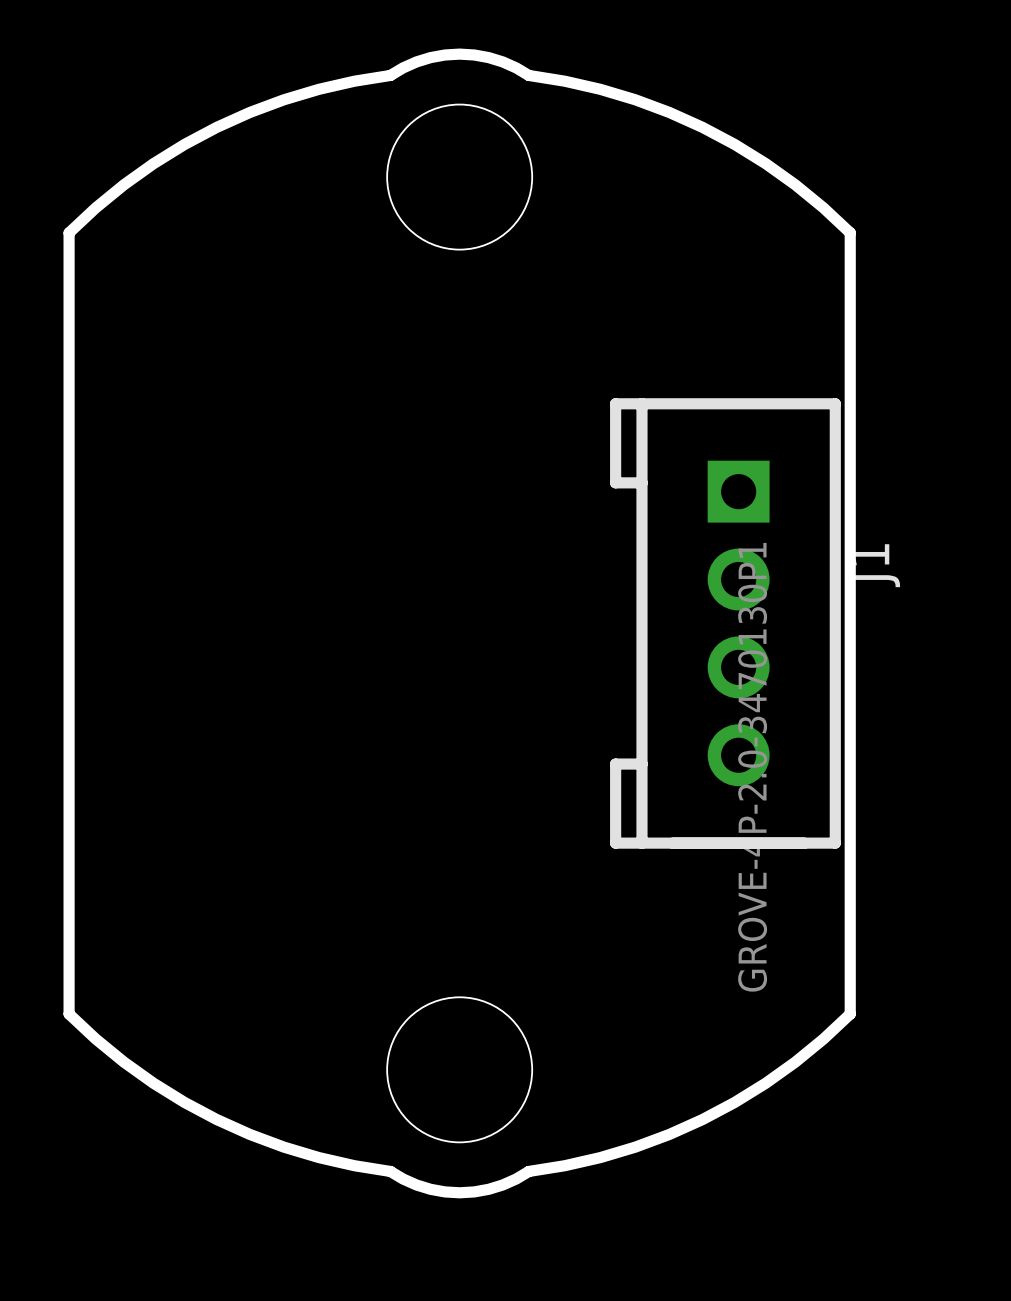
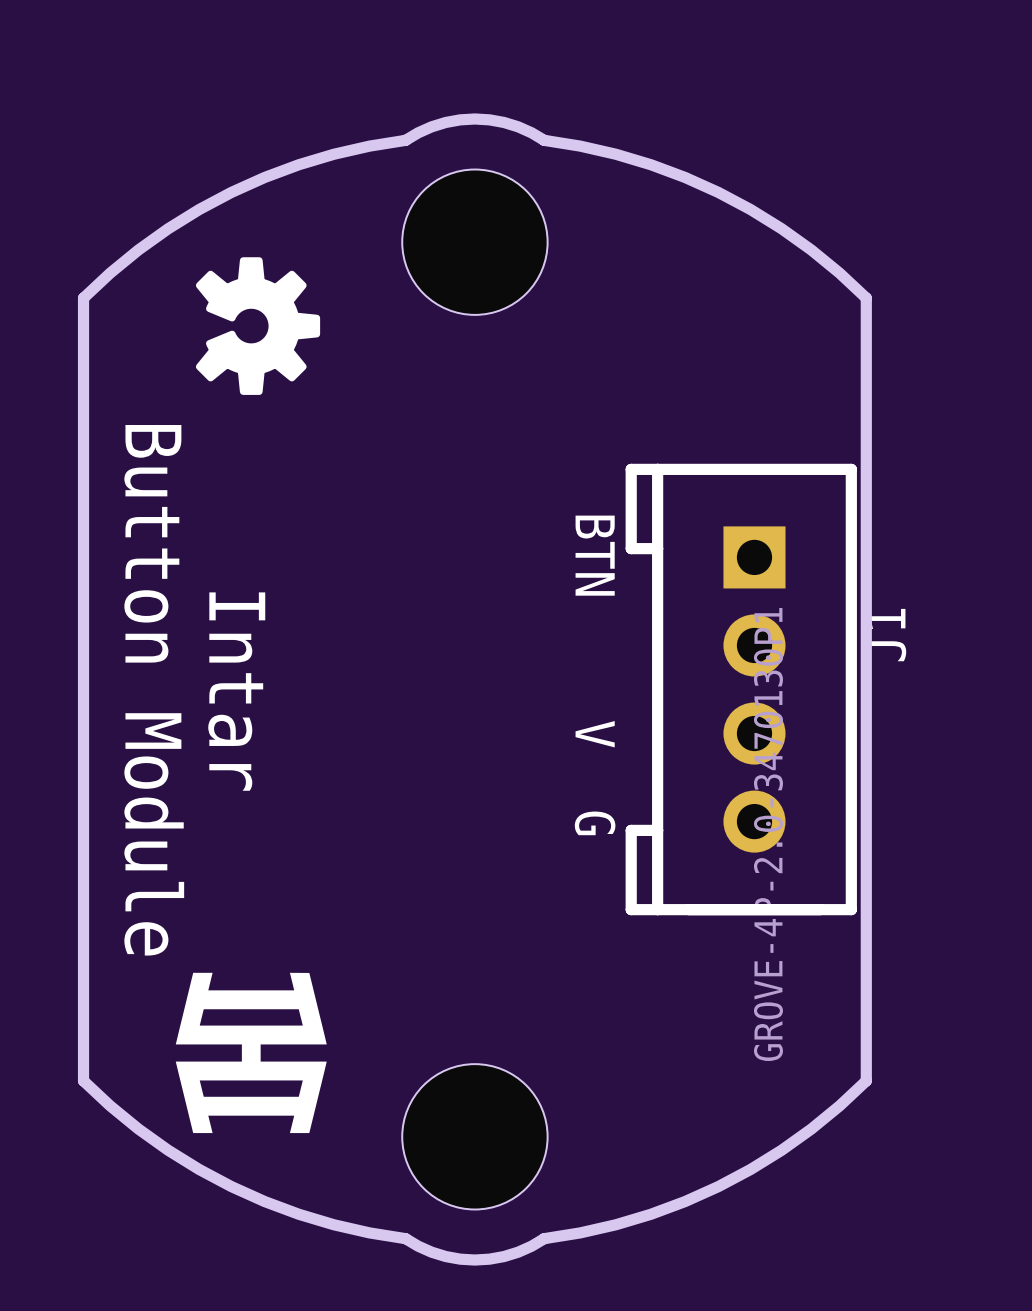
drawing: none -> [195, 257, 321, 395]
text: none -> BTN (595, 555)
text: none -> Button Module (154, 690)
text: none -> Intar (236, 691)
text: none -> V (595, 734)
text: none -> G (595, 823)
drawing: none -> [175, 972, 327, 1134]

